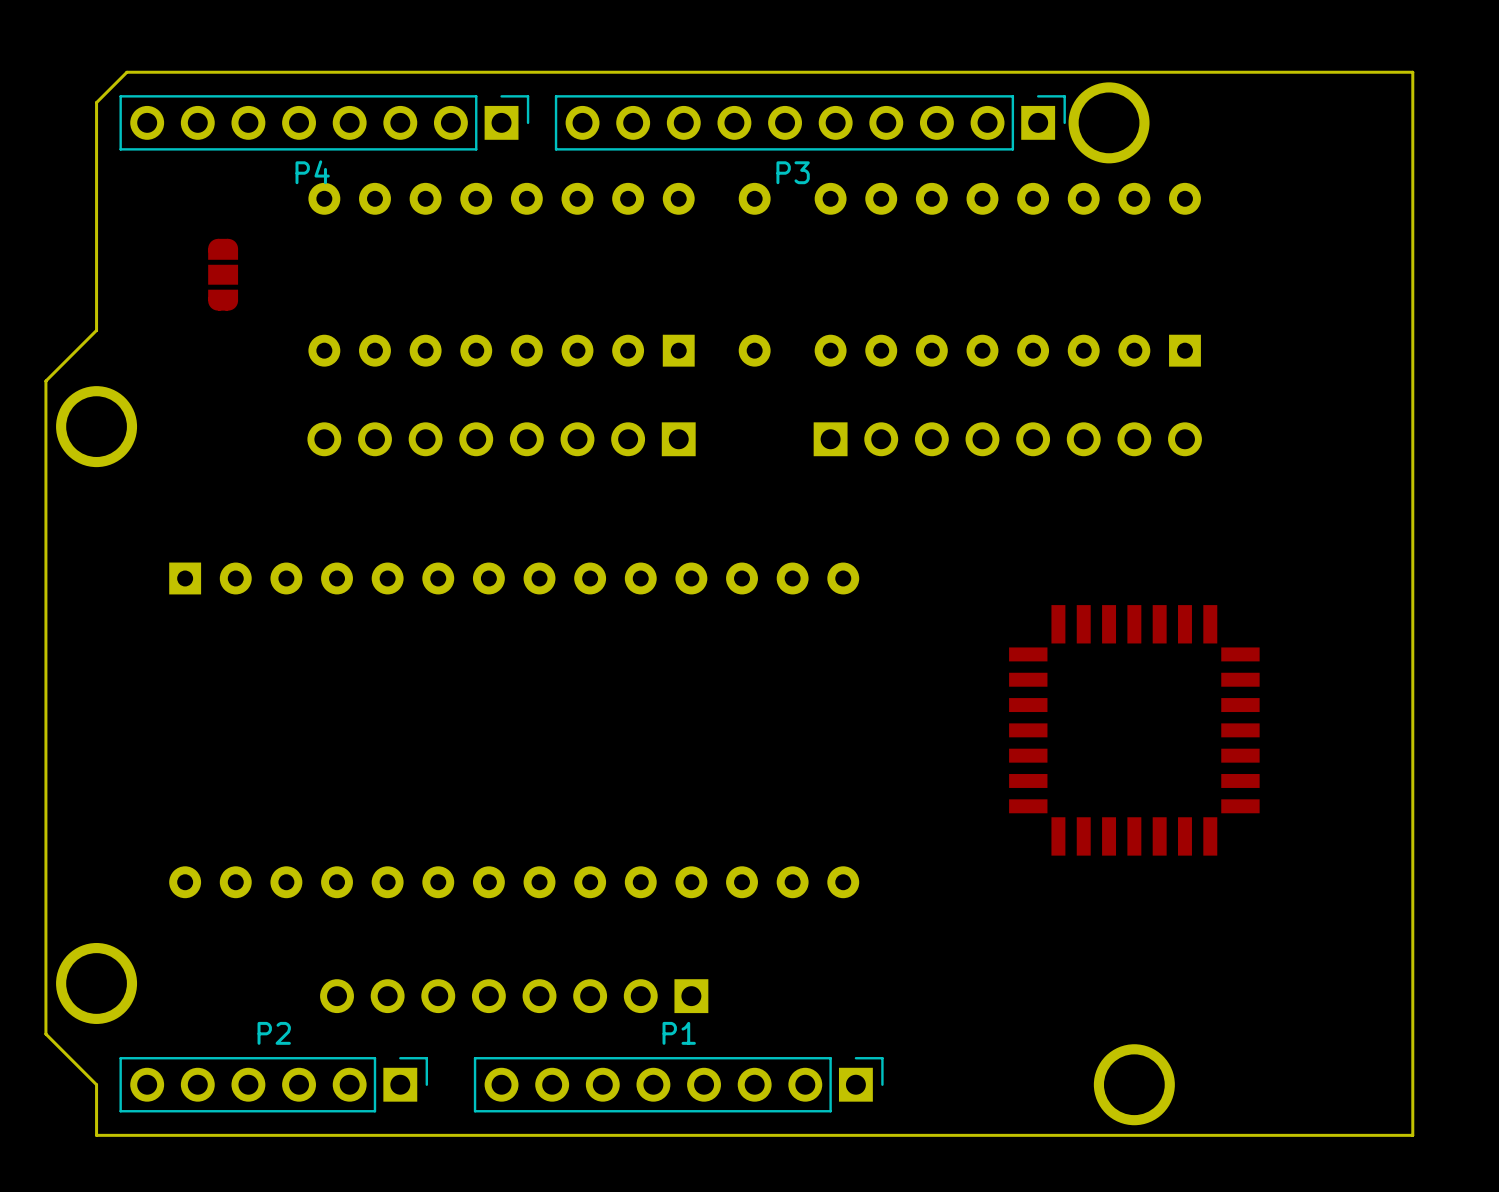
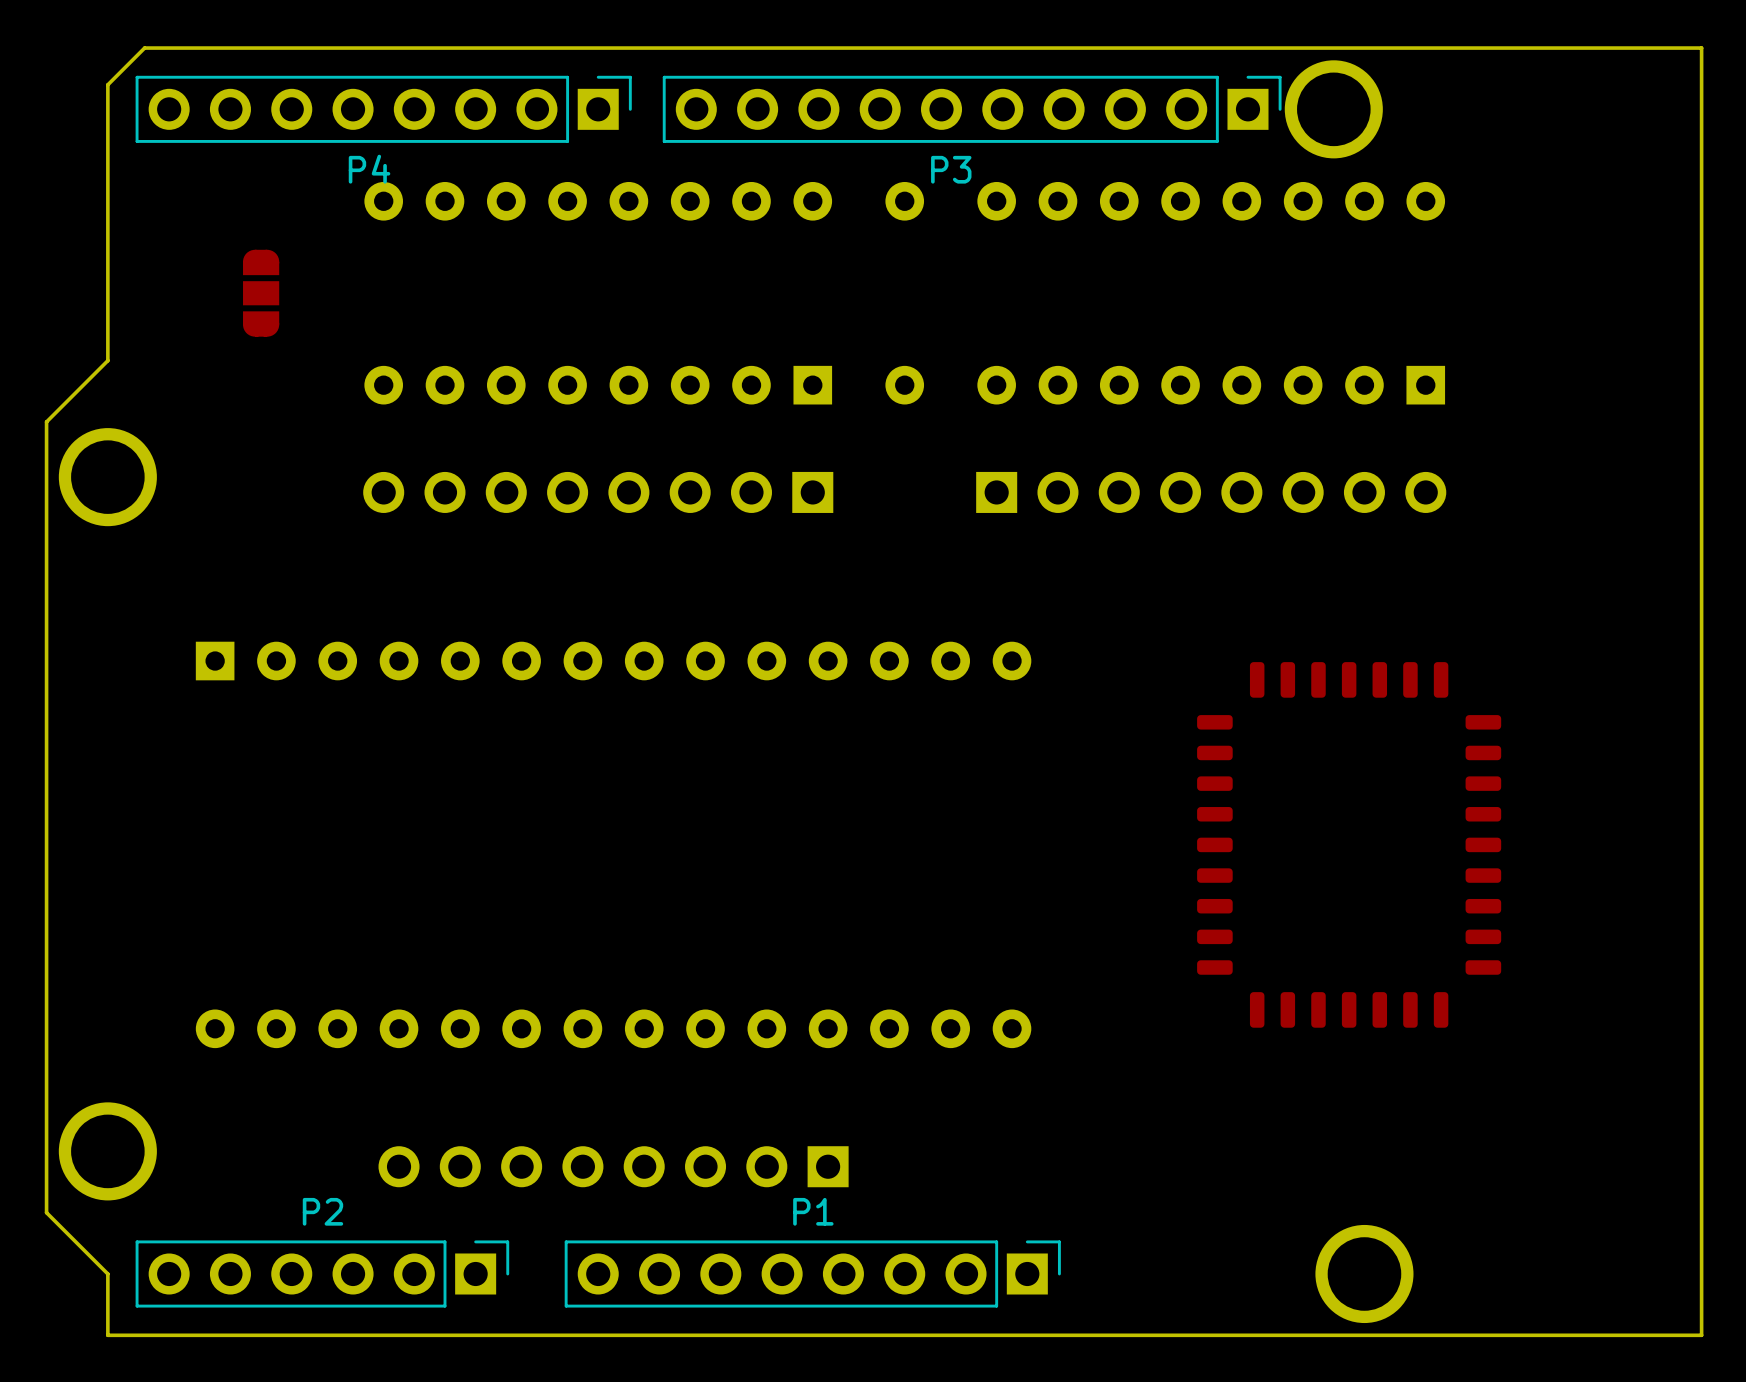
part footprint: [1009, 605, 1260, 856] -> [1197, 662, 1502, 1028]

